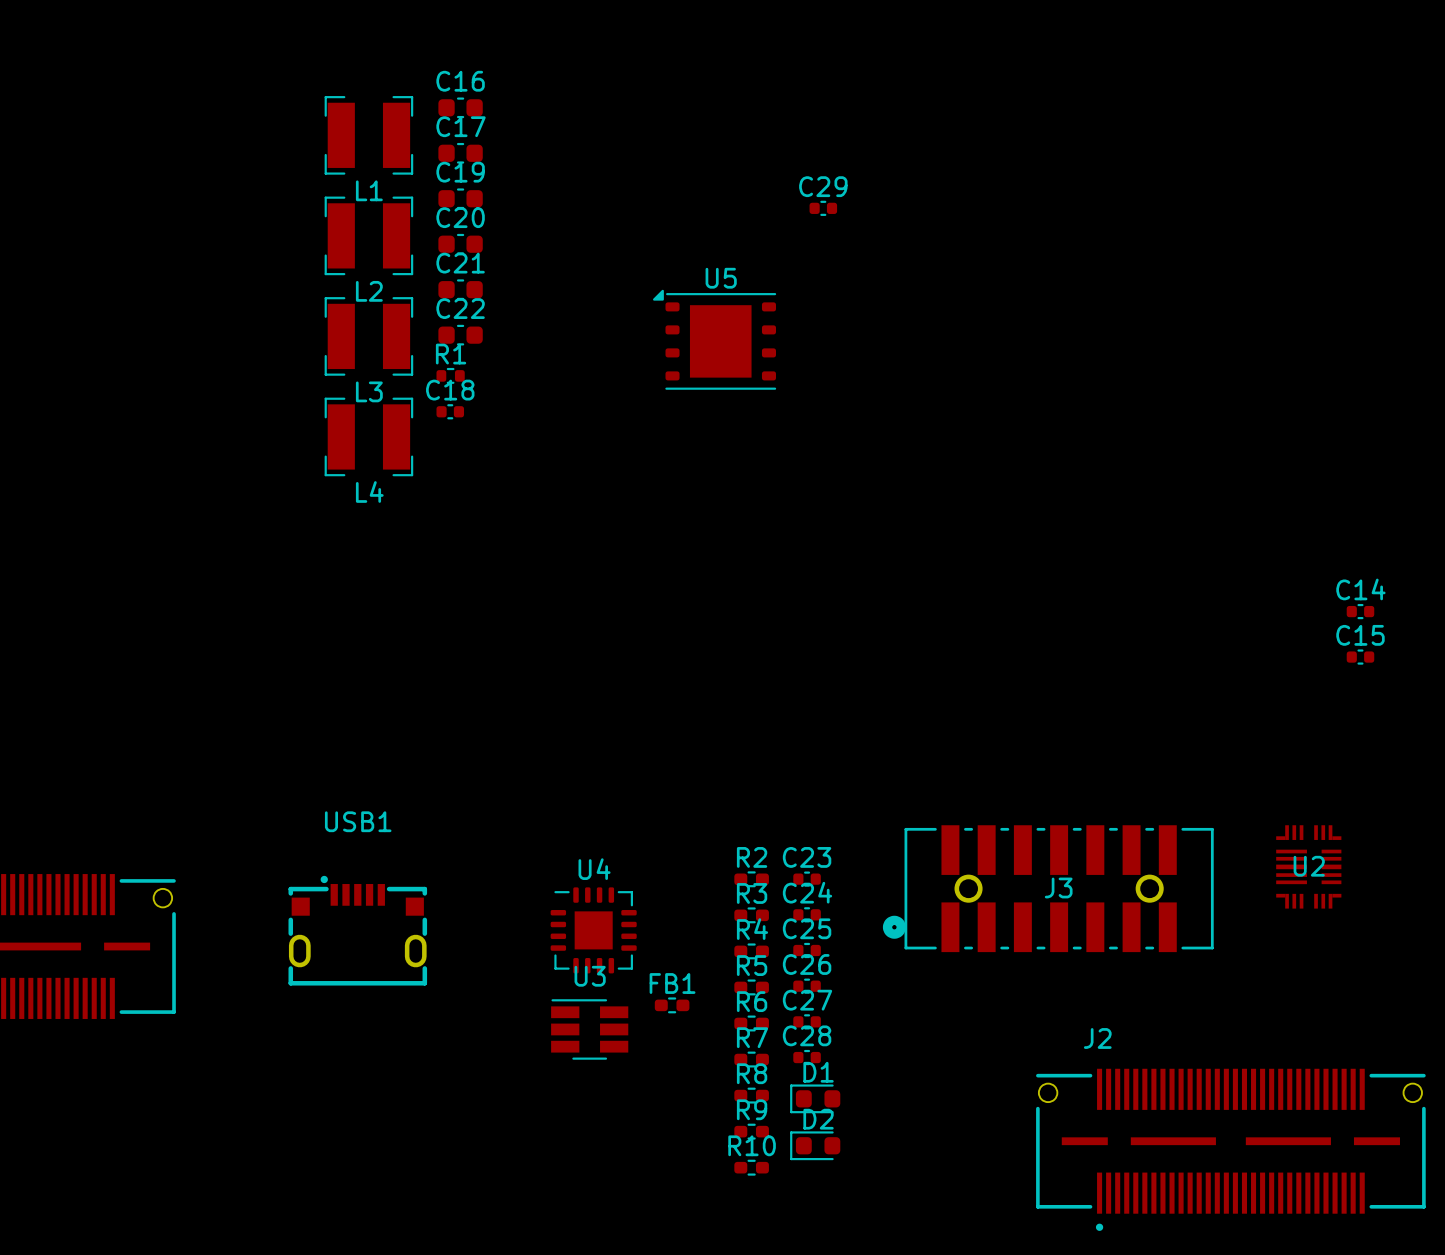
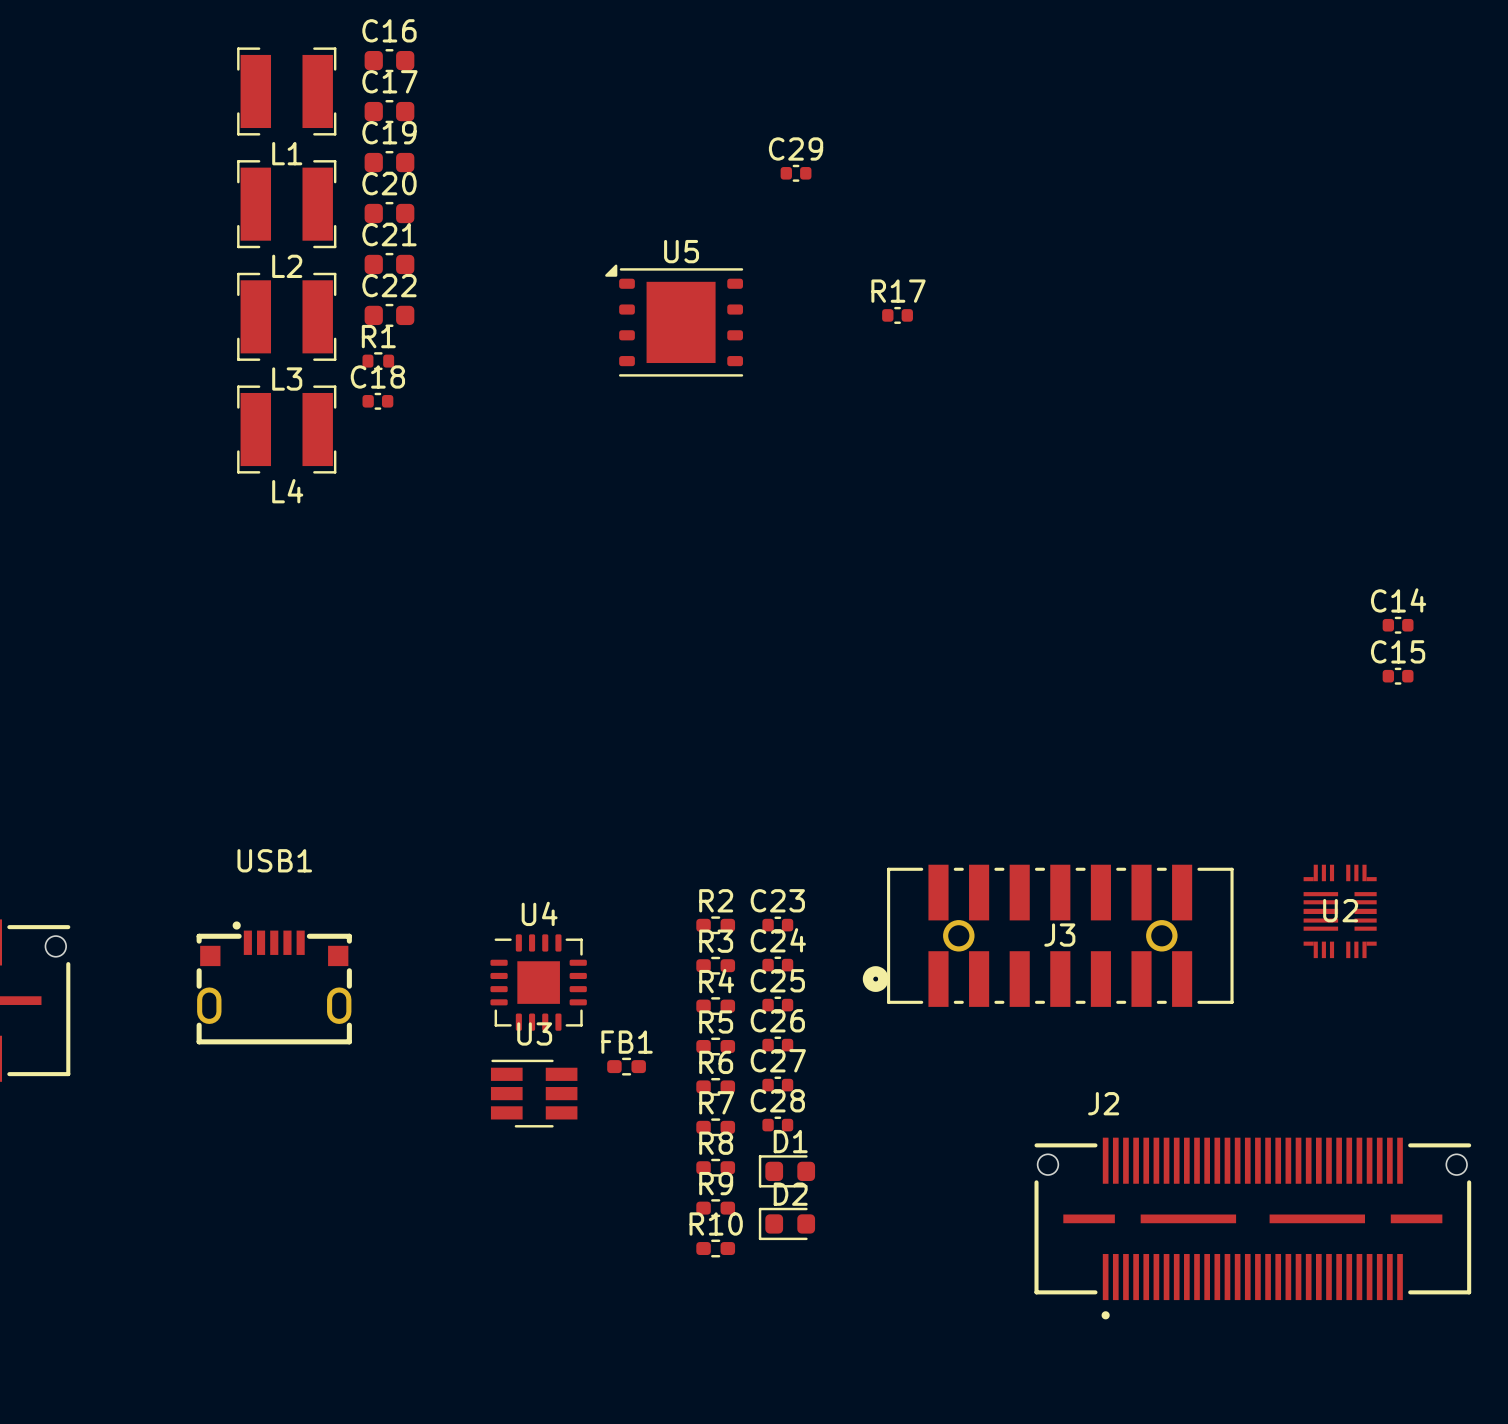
R17: none -> (897, 315)

